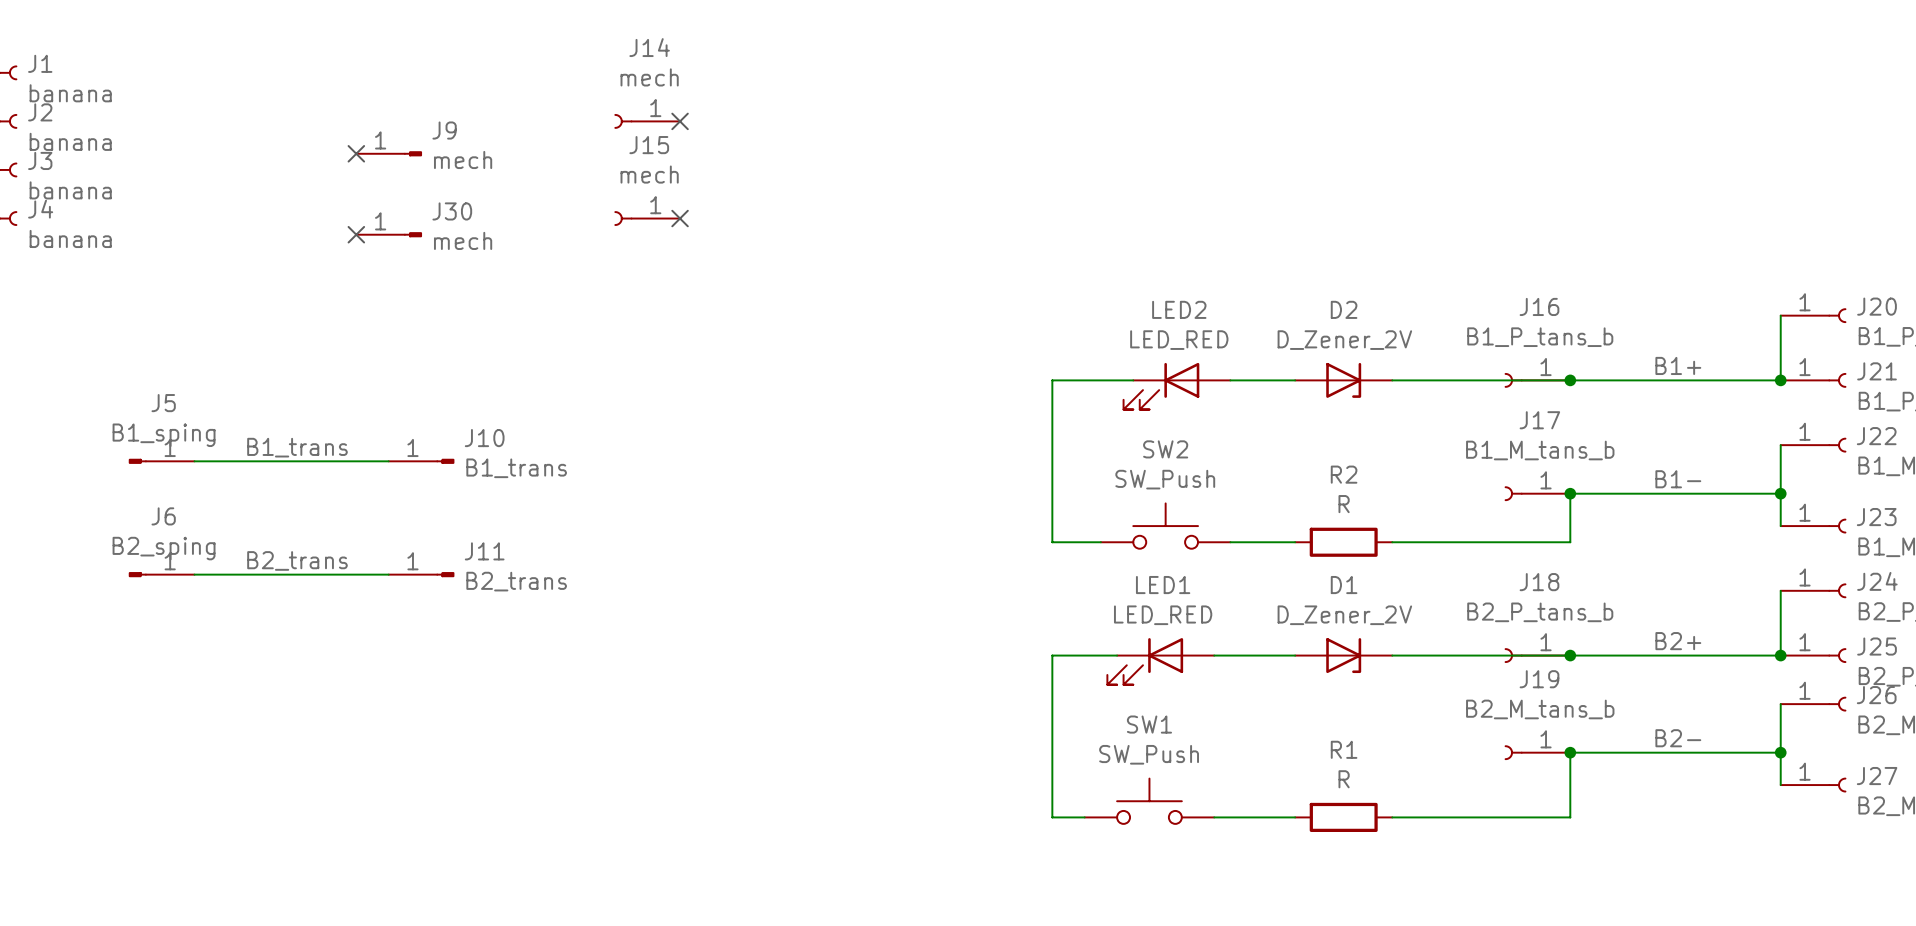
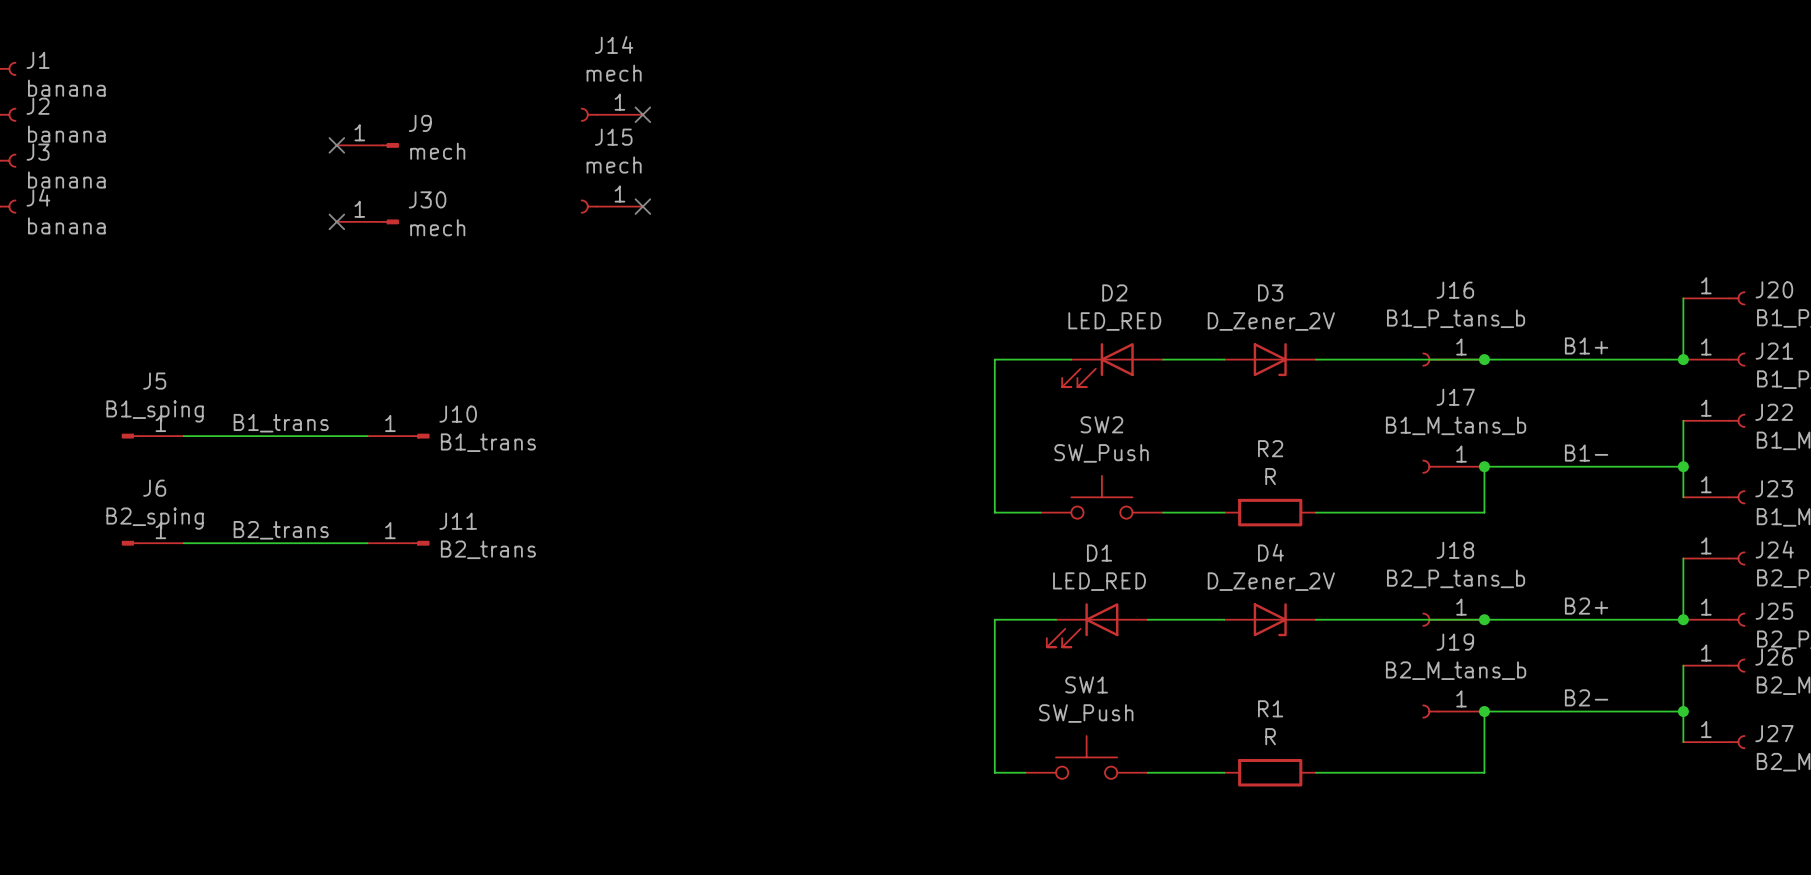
LED2 name: LED2 (1179, 309) -> D2 (1114, 292)
D2 name: D2 (1344, 309) -> D3 (1270, 292)
LED1 name: LED1 (1163, 585) -> D1 (1099, 553)
D1 name: D1 (1344, 585) -> D4 (1270, 552)

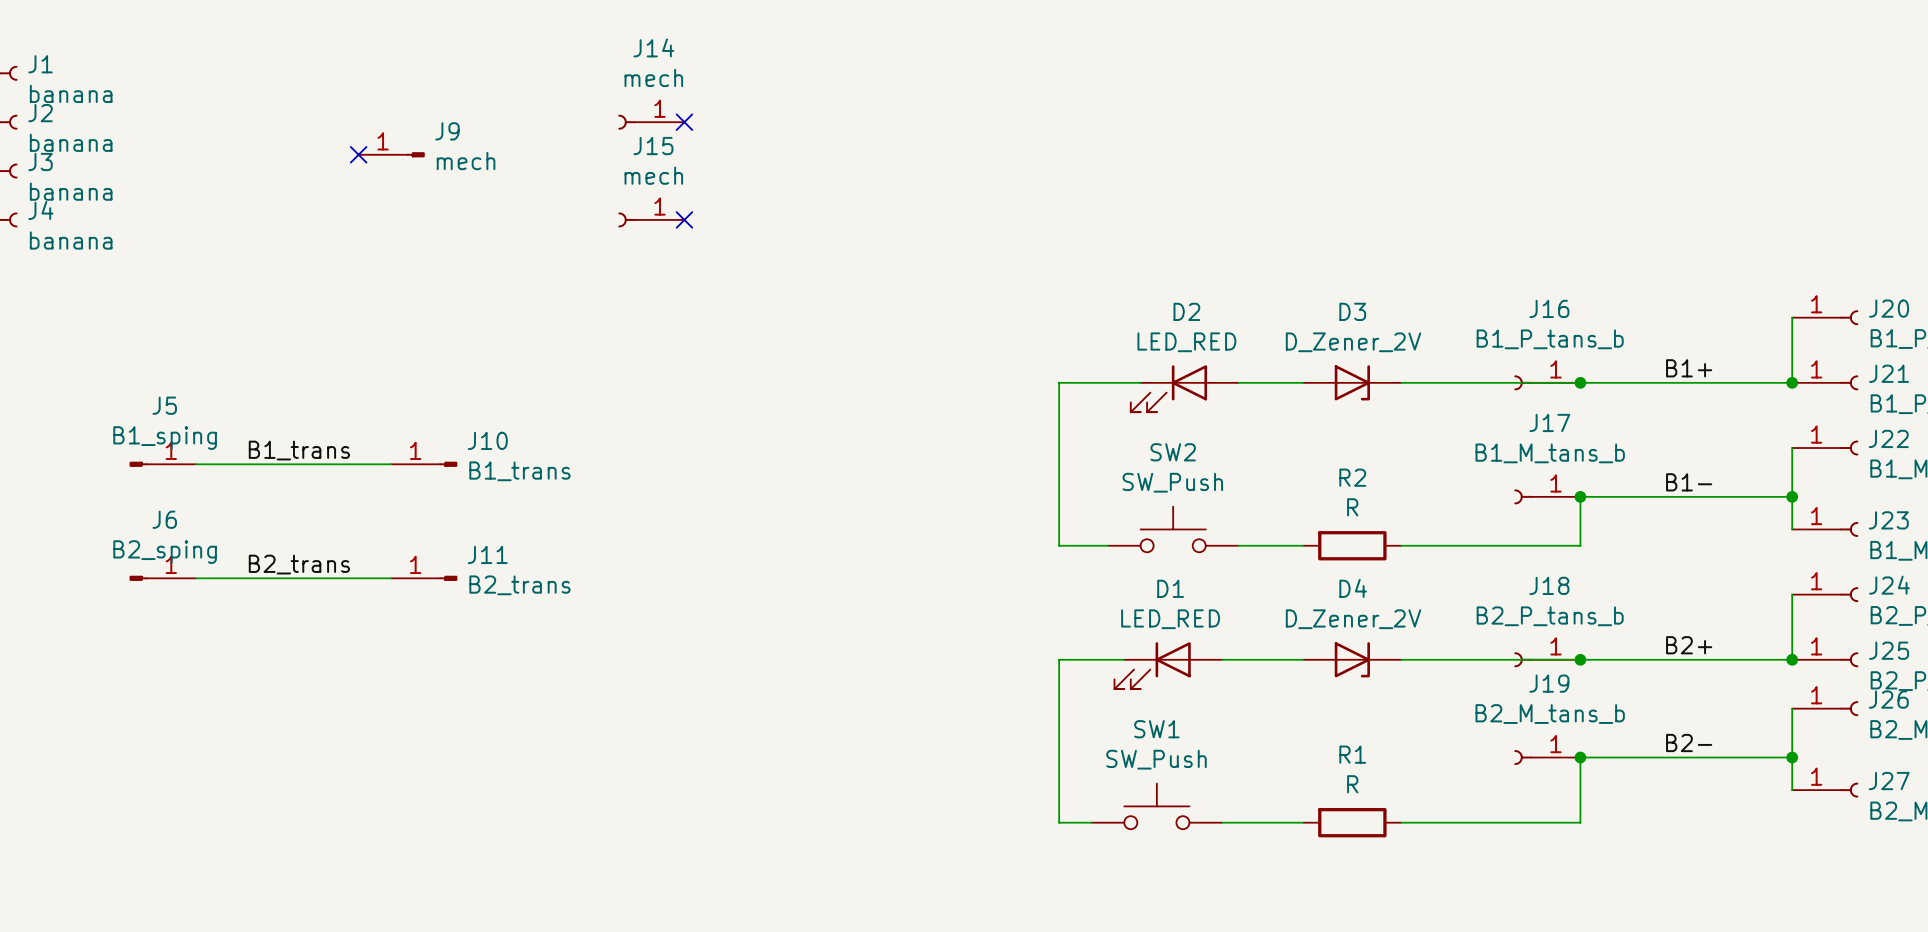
no-connect mark: (336, 221) -> none
J30: mech (367, 221) -> none

